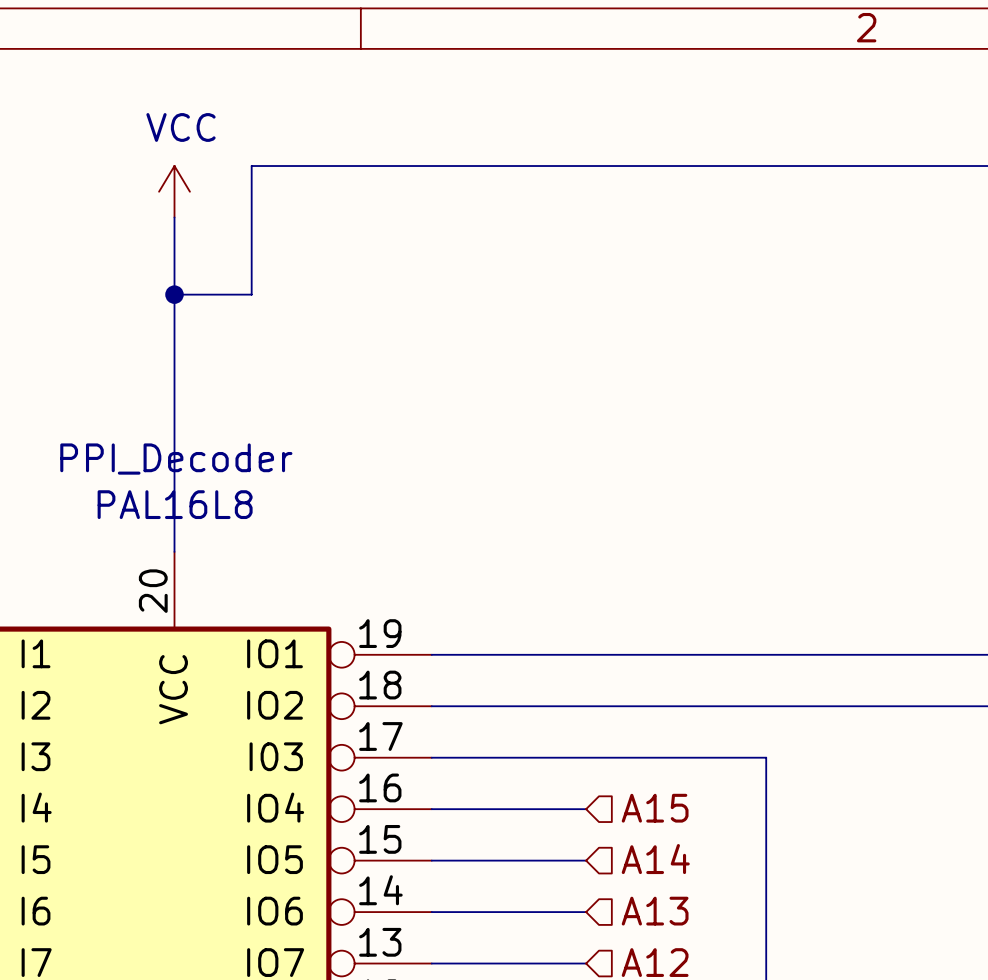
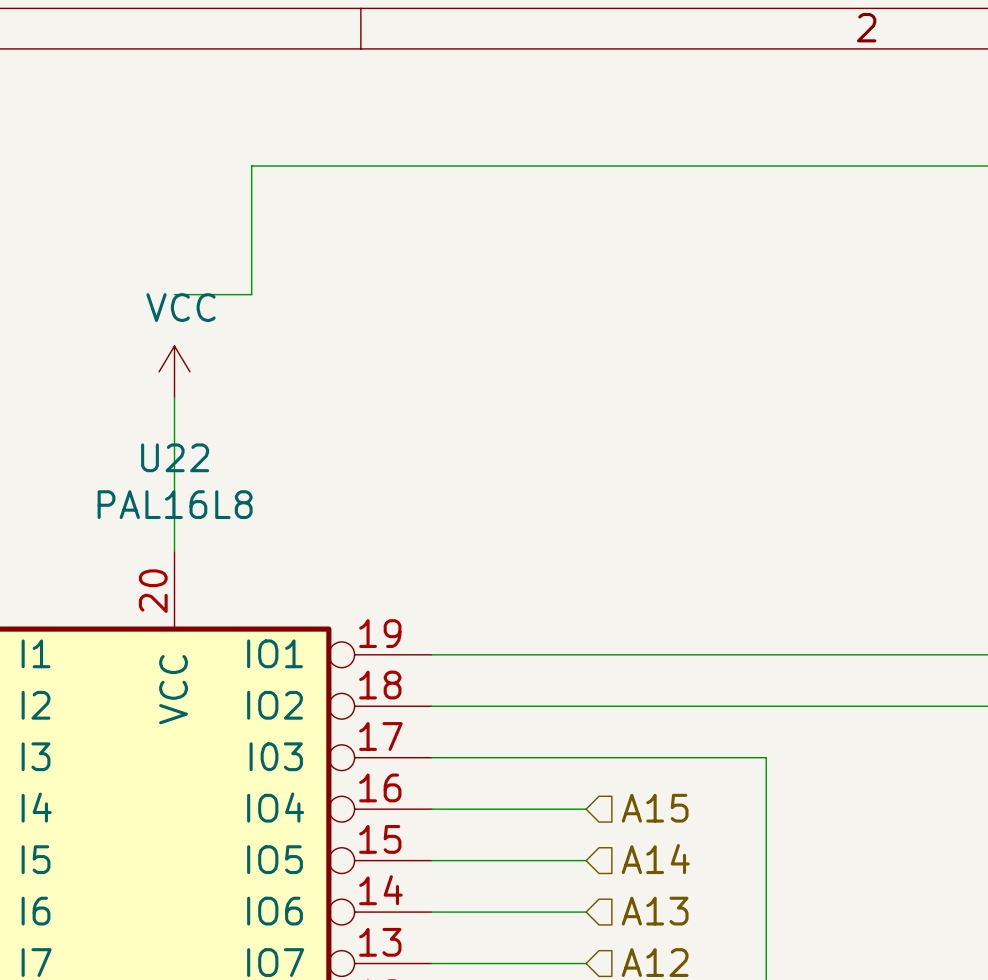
power symbol position: VCC (174, 191) -> VCC (174, 371)
wire: (174, 217) (174, 397) -> none
junction: (174, 294) -> none
PPI_Decoder name: PPI_Decoder (176, 459) -> U22 (175, 457)

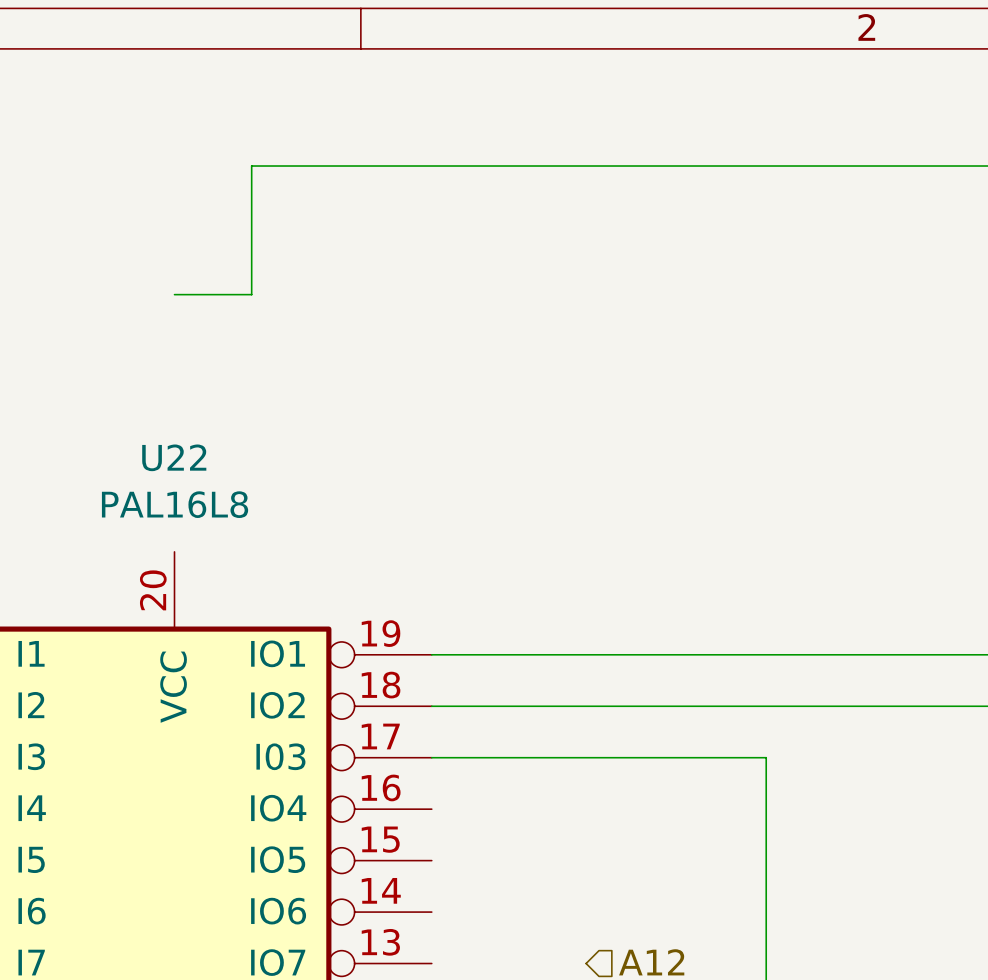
power symbol: VCC (174, 371) -> none
wire: (174, 397) (174, 551) -> none
hierarchical label: A15 (655, 808) -> none
wire: (431, 809) (586, 809) -> none
hierarchical label: A14 (655, 859) -> none
wire: (431, 860) (586, 860) -> none
hierarchical label: A13 (655, 911) -> none
wire: (431, 912) (586, 912) -> none
wire: (431, 963) (586, 963) -> none

